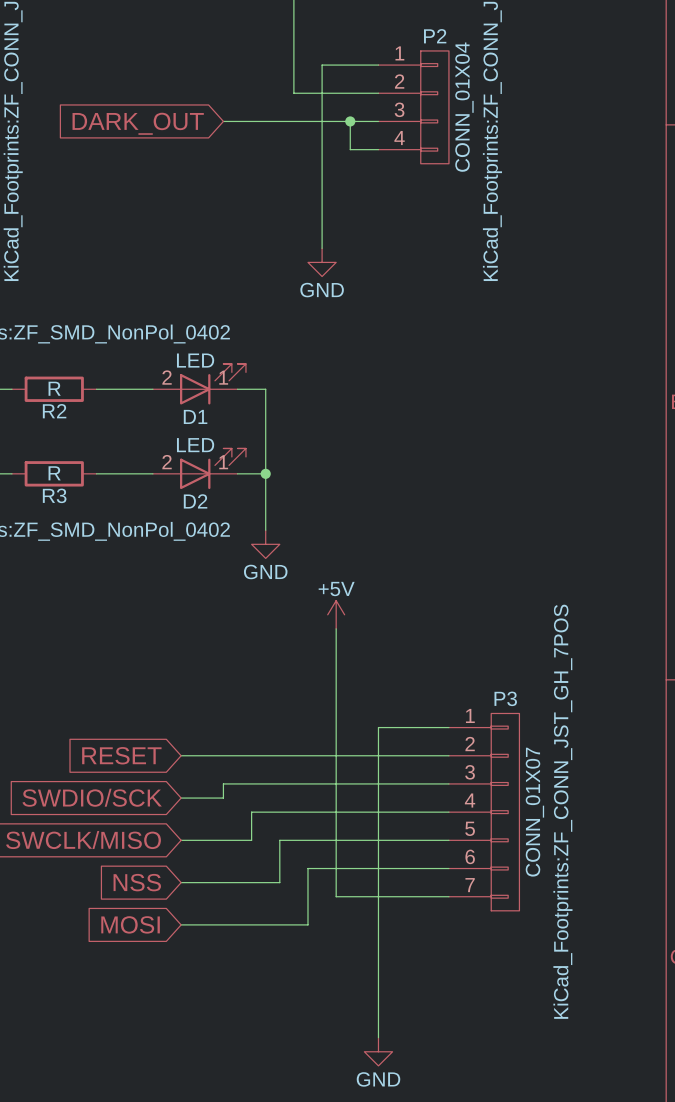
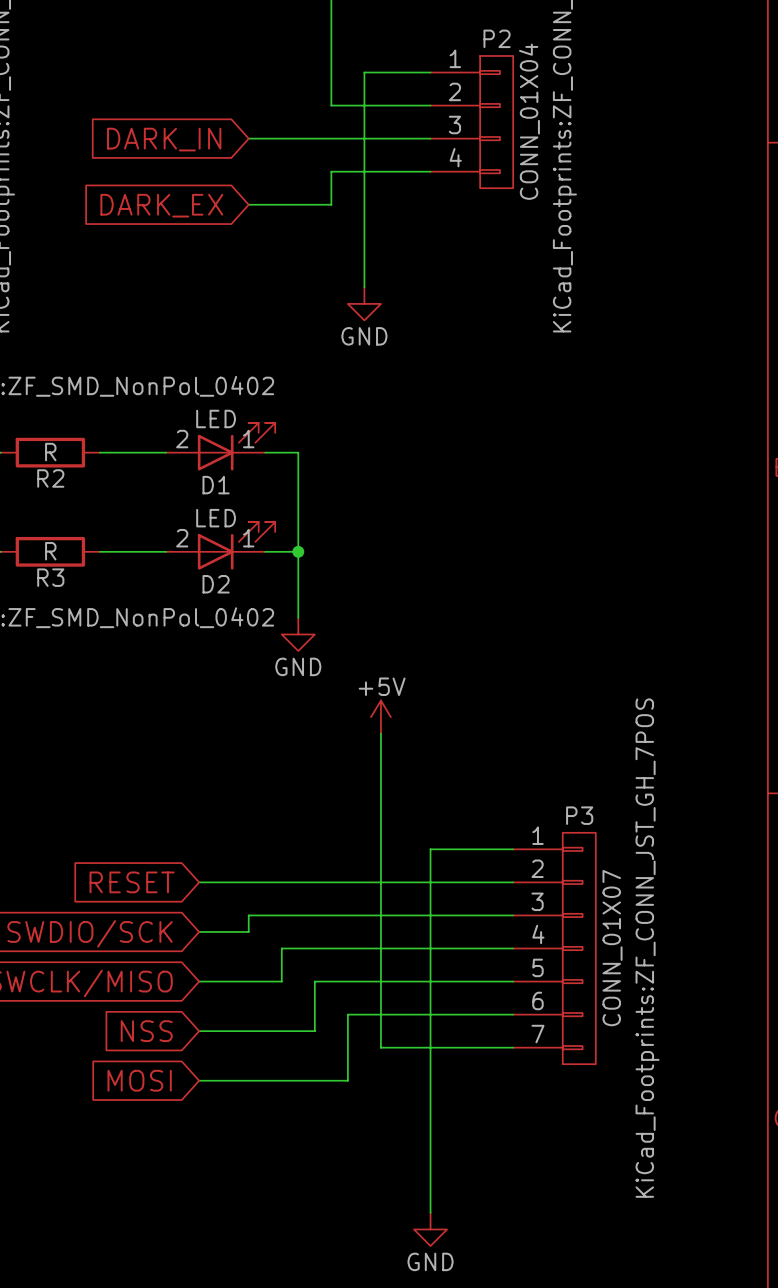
wire: (350, 121) (350, 149) -> (248, 204) (331, 204) (331, 171) (397, 171)
junction: (350, 121) -> none
global label: DARK_OUT (138, 123) -> DARK_IN (164, 139)
global label: none -> DARK_EX (161, 205)

